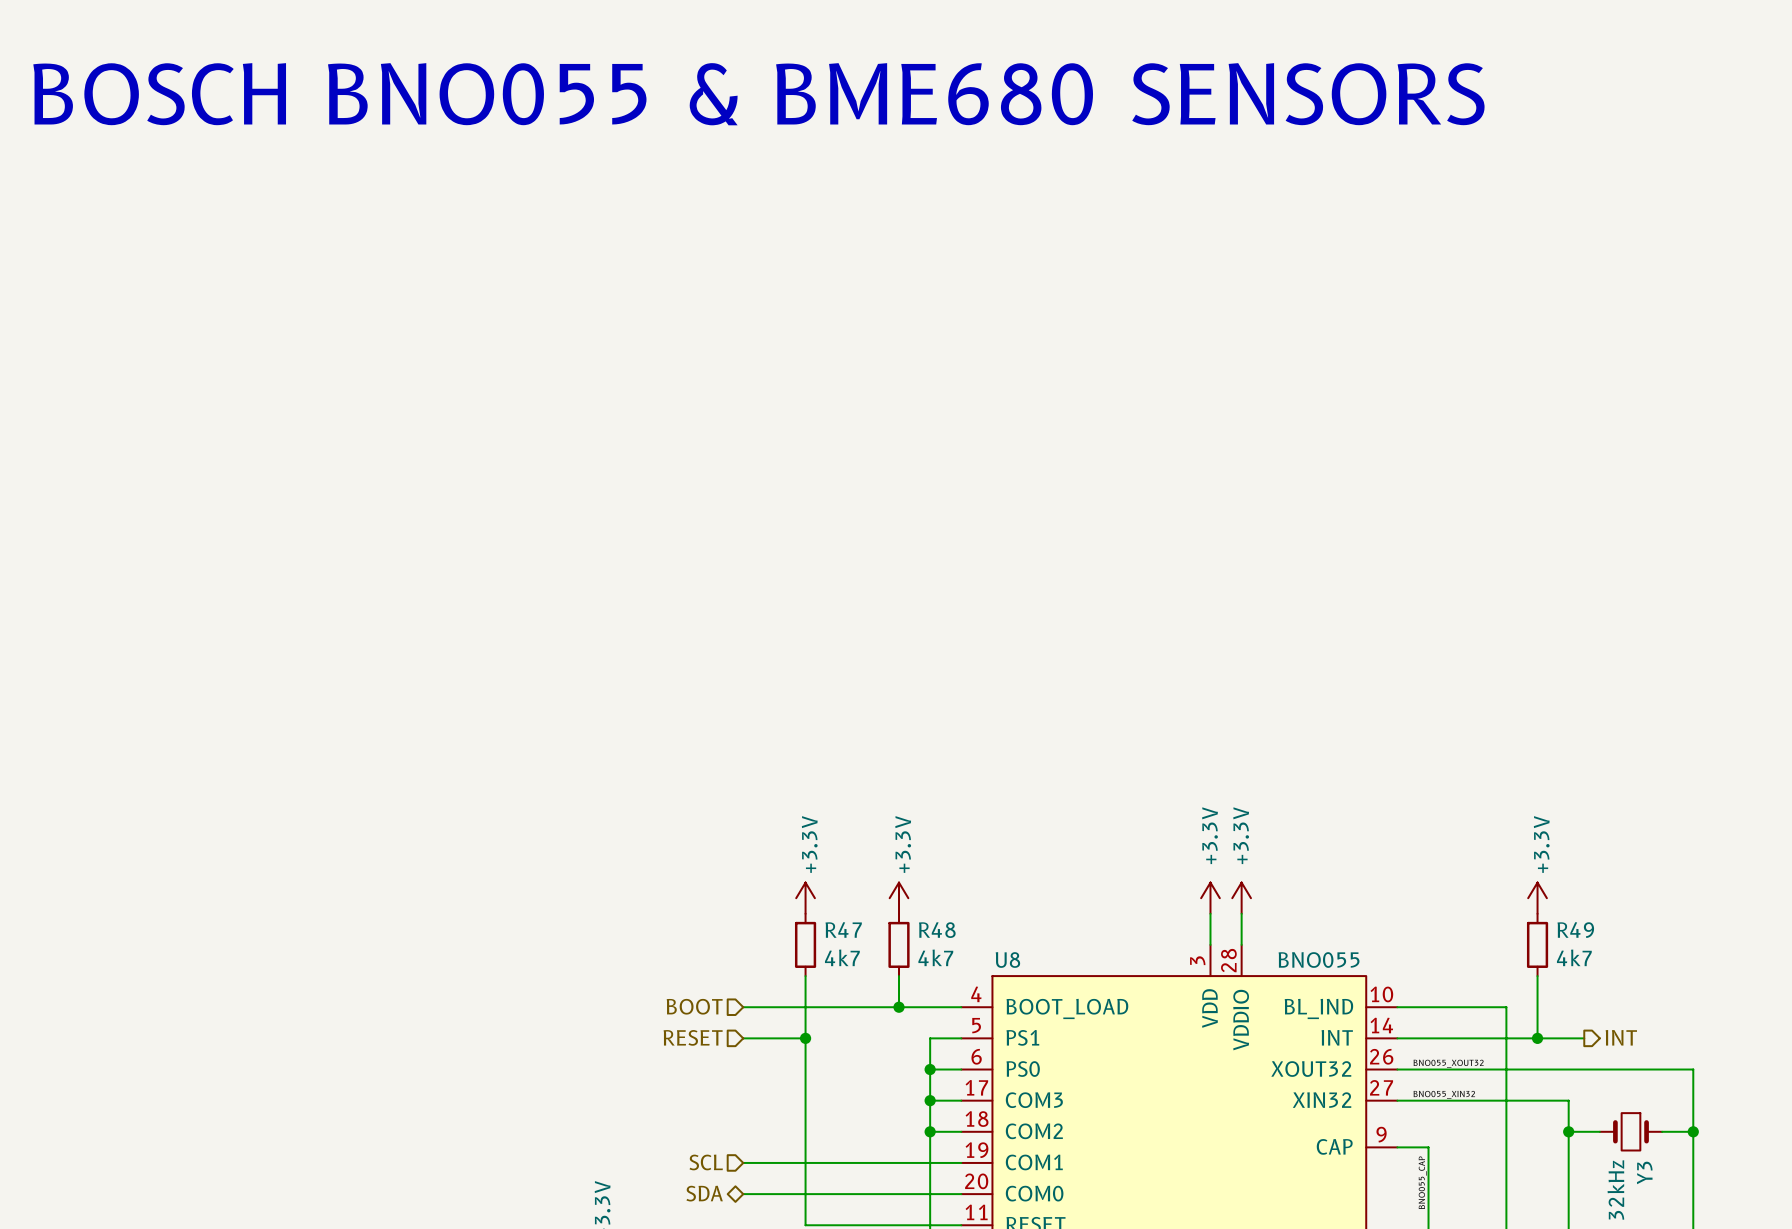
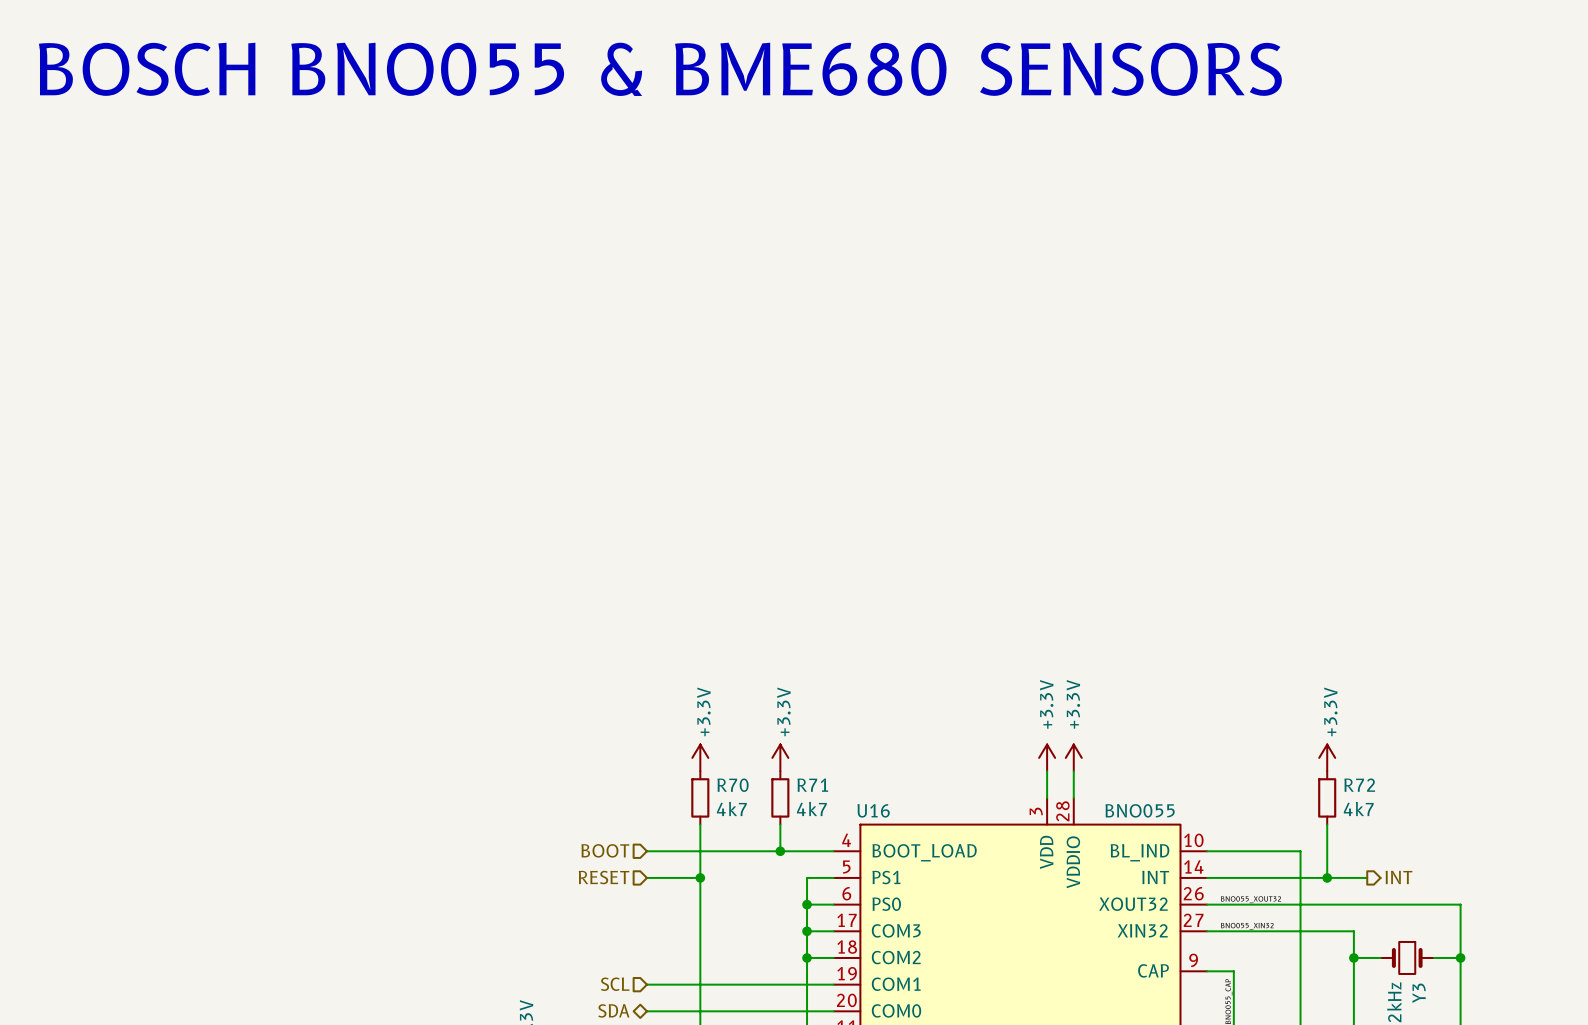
R47 name: R47 (843, 930) -> R70 (733, 785)
R48 name: R48 (937, 930) -> R71 (812, 785)
R49 name: R49 (1575, 930) -> R72 (1359, 785)
U8 name: U8 (1007, 960) -> U16 (873, 810)

